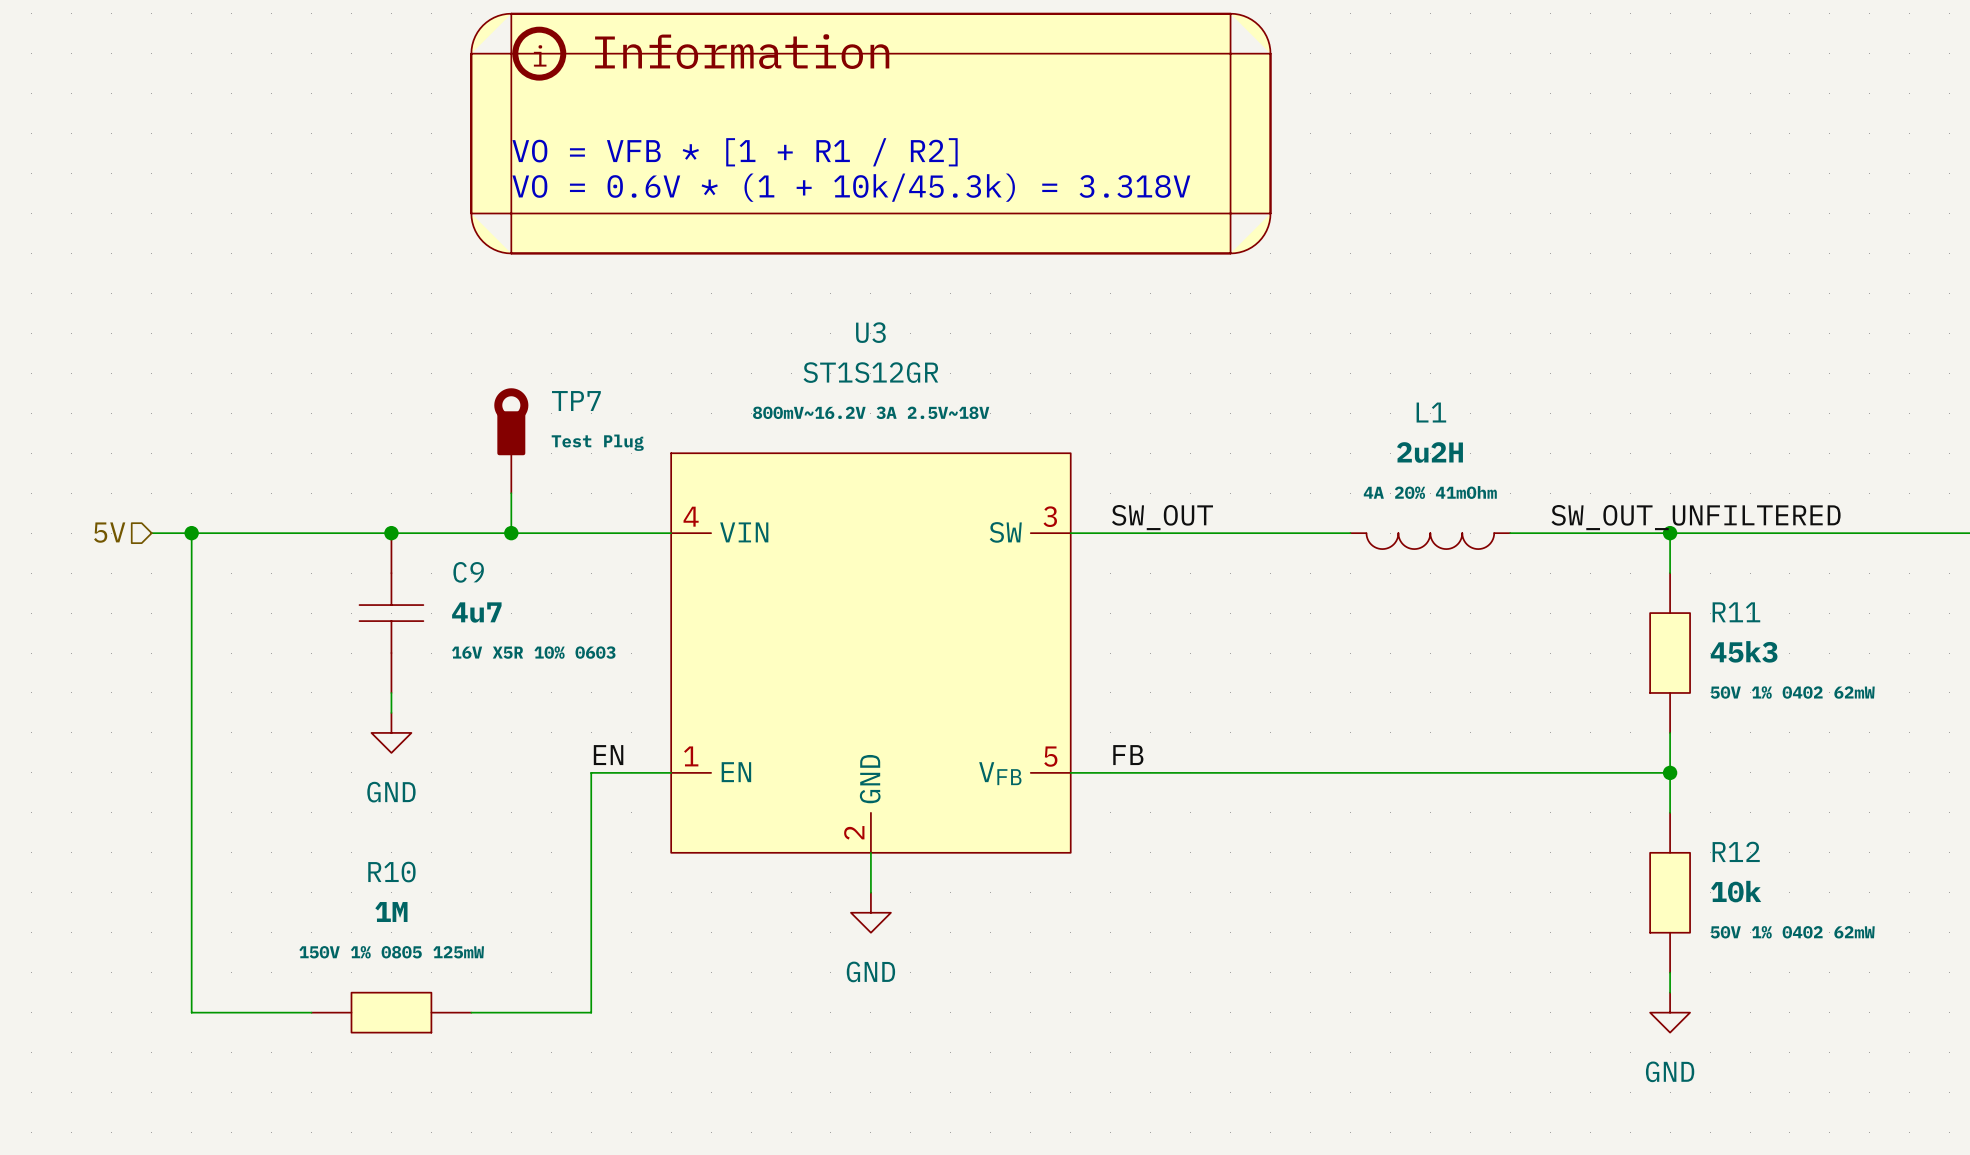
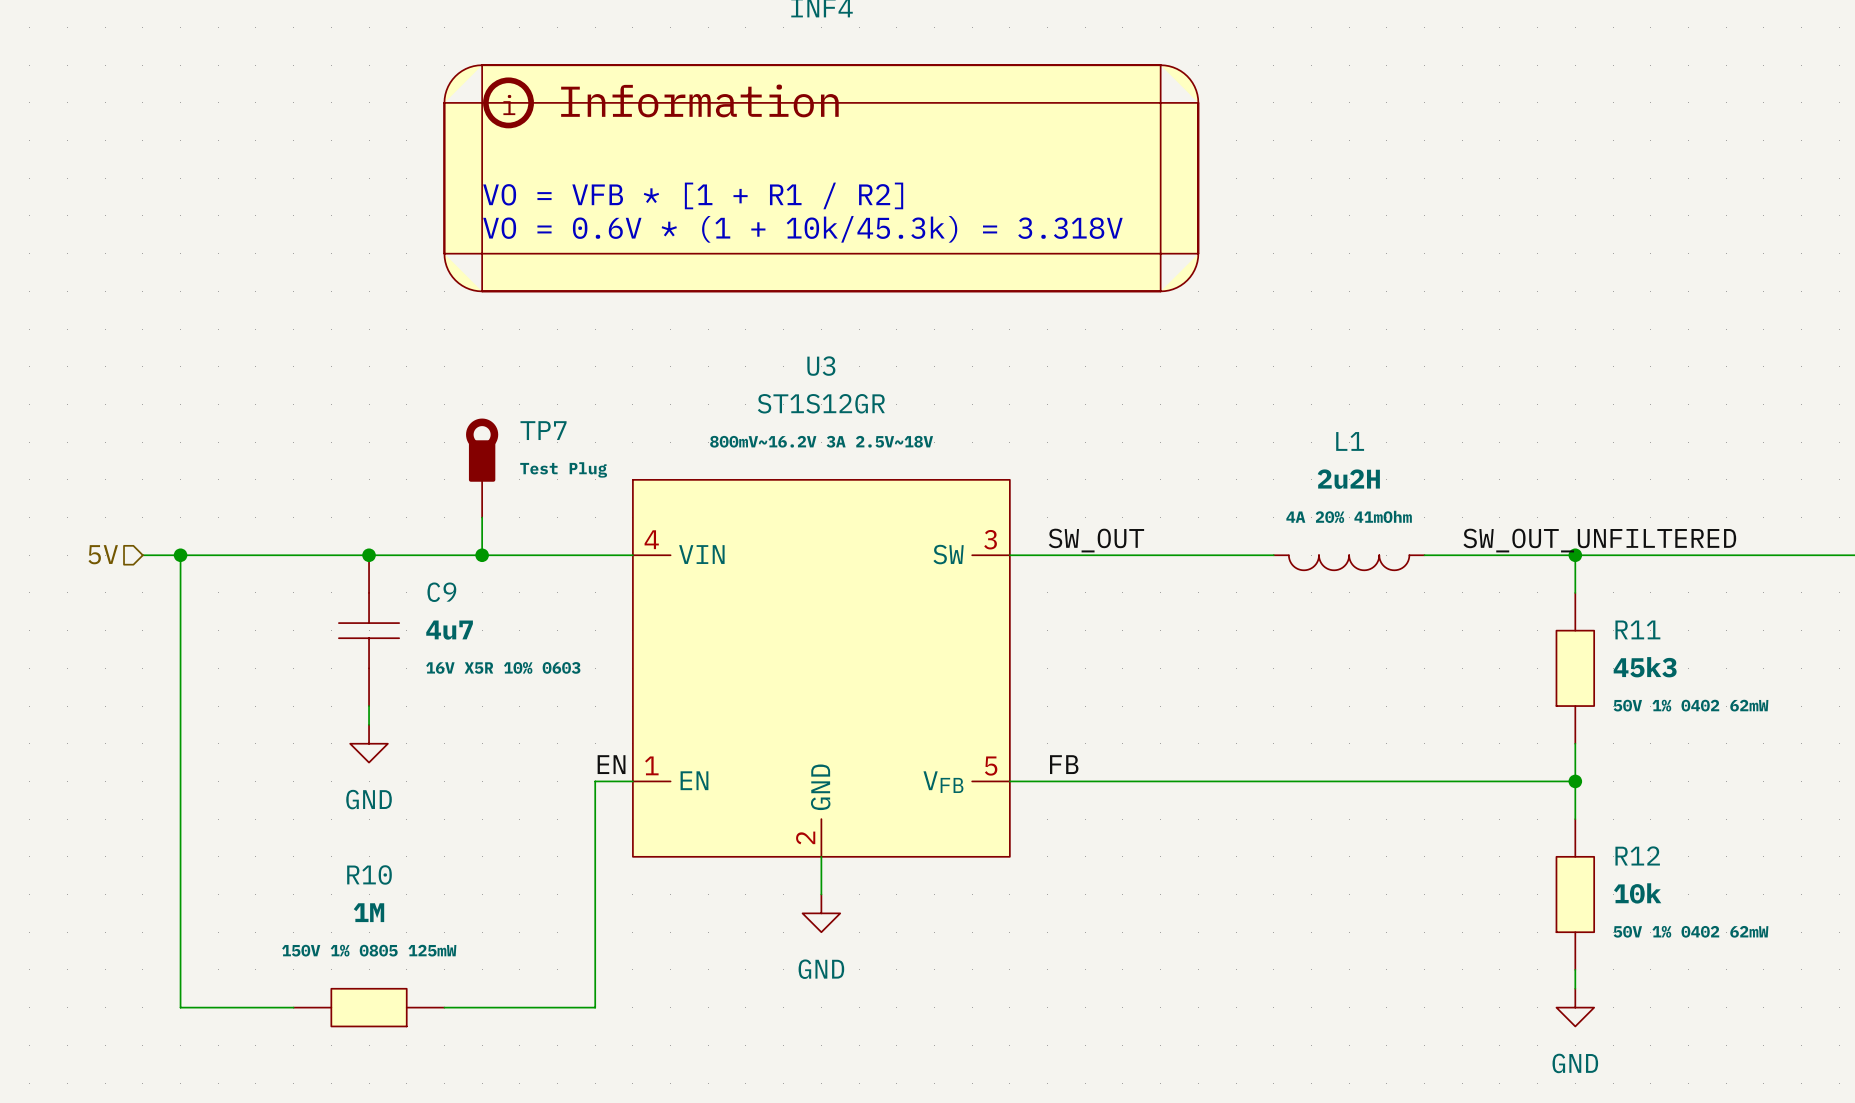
label position: EN (608, 755) -> EN (611, 764)
wire: (631, 772) (591, 772) (591, 1012) -> (595, 781) (595, 1007) (557, 1007)

